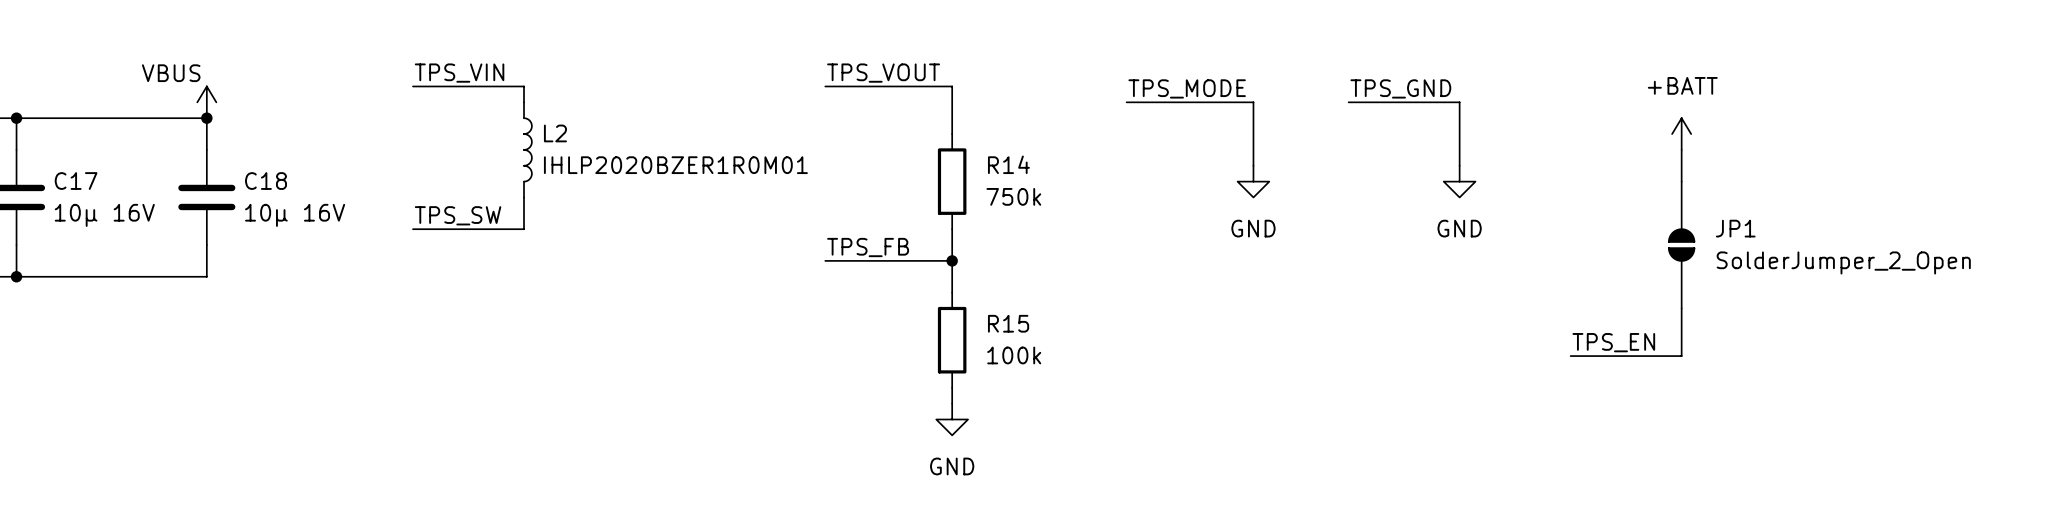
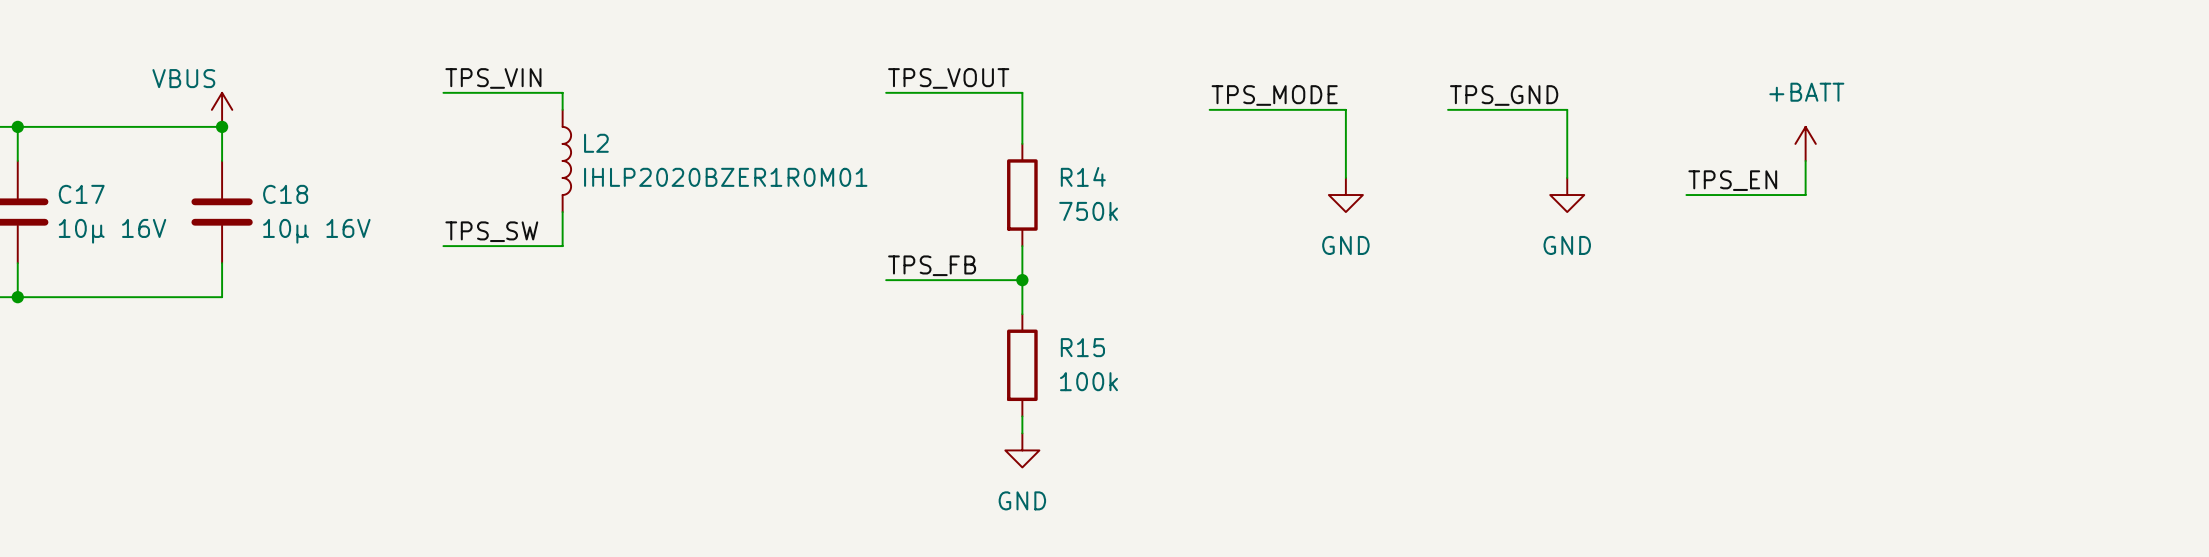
wire: none -> (1686, 195) (1805, 195)
JP1: SolderJumper_2_Open (1681, 245) -> none
wire: (1681, 308) (1681, 356) (1570, 356) -> none
label position: TPS_EN (1613, 342) -> TPS_EN (1732, 180)

